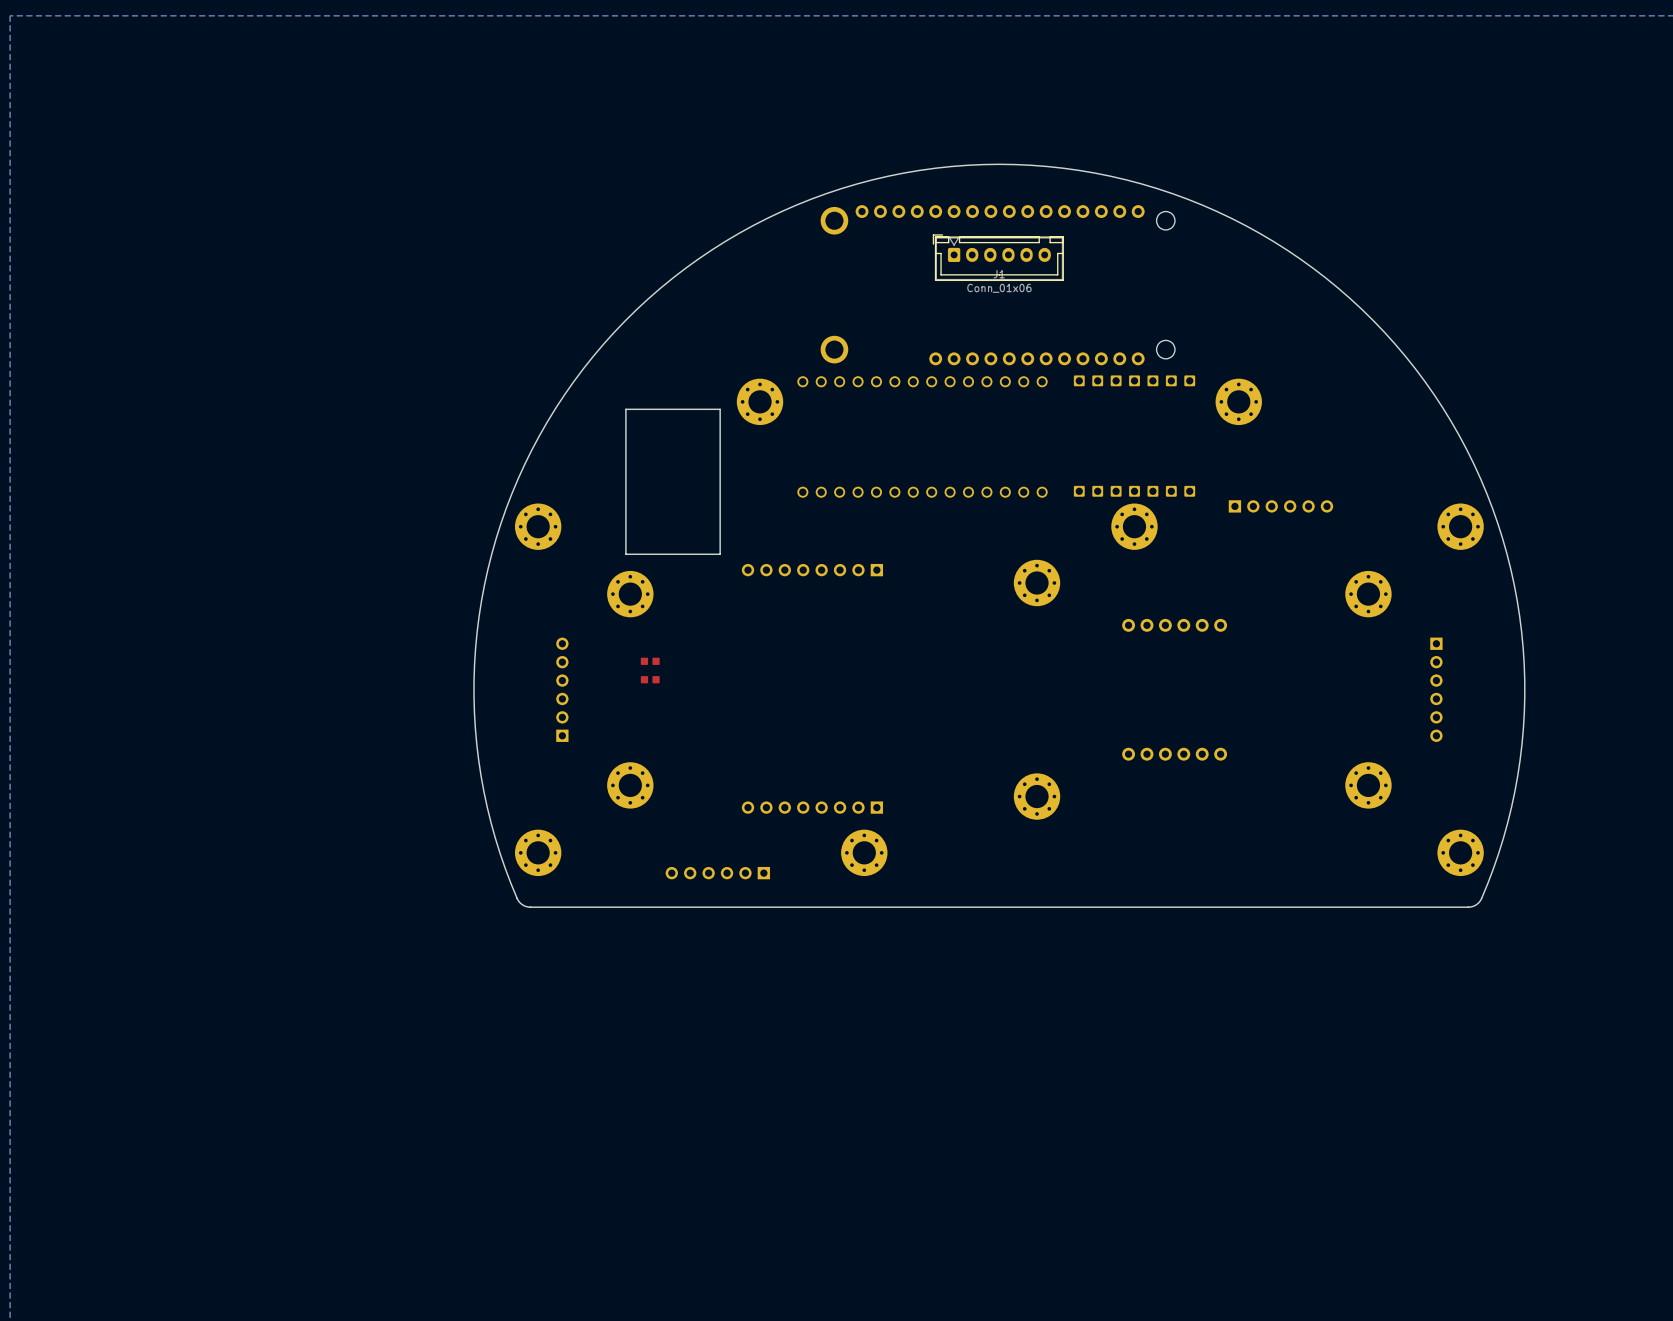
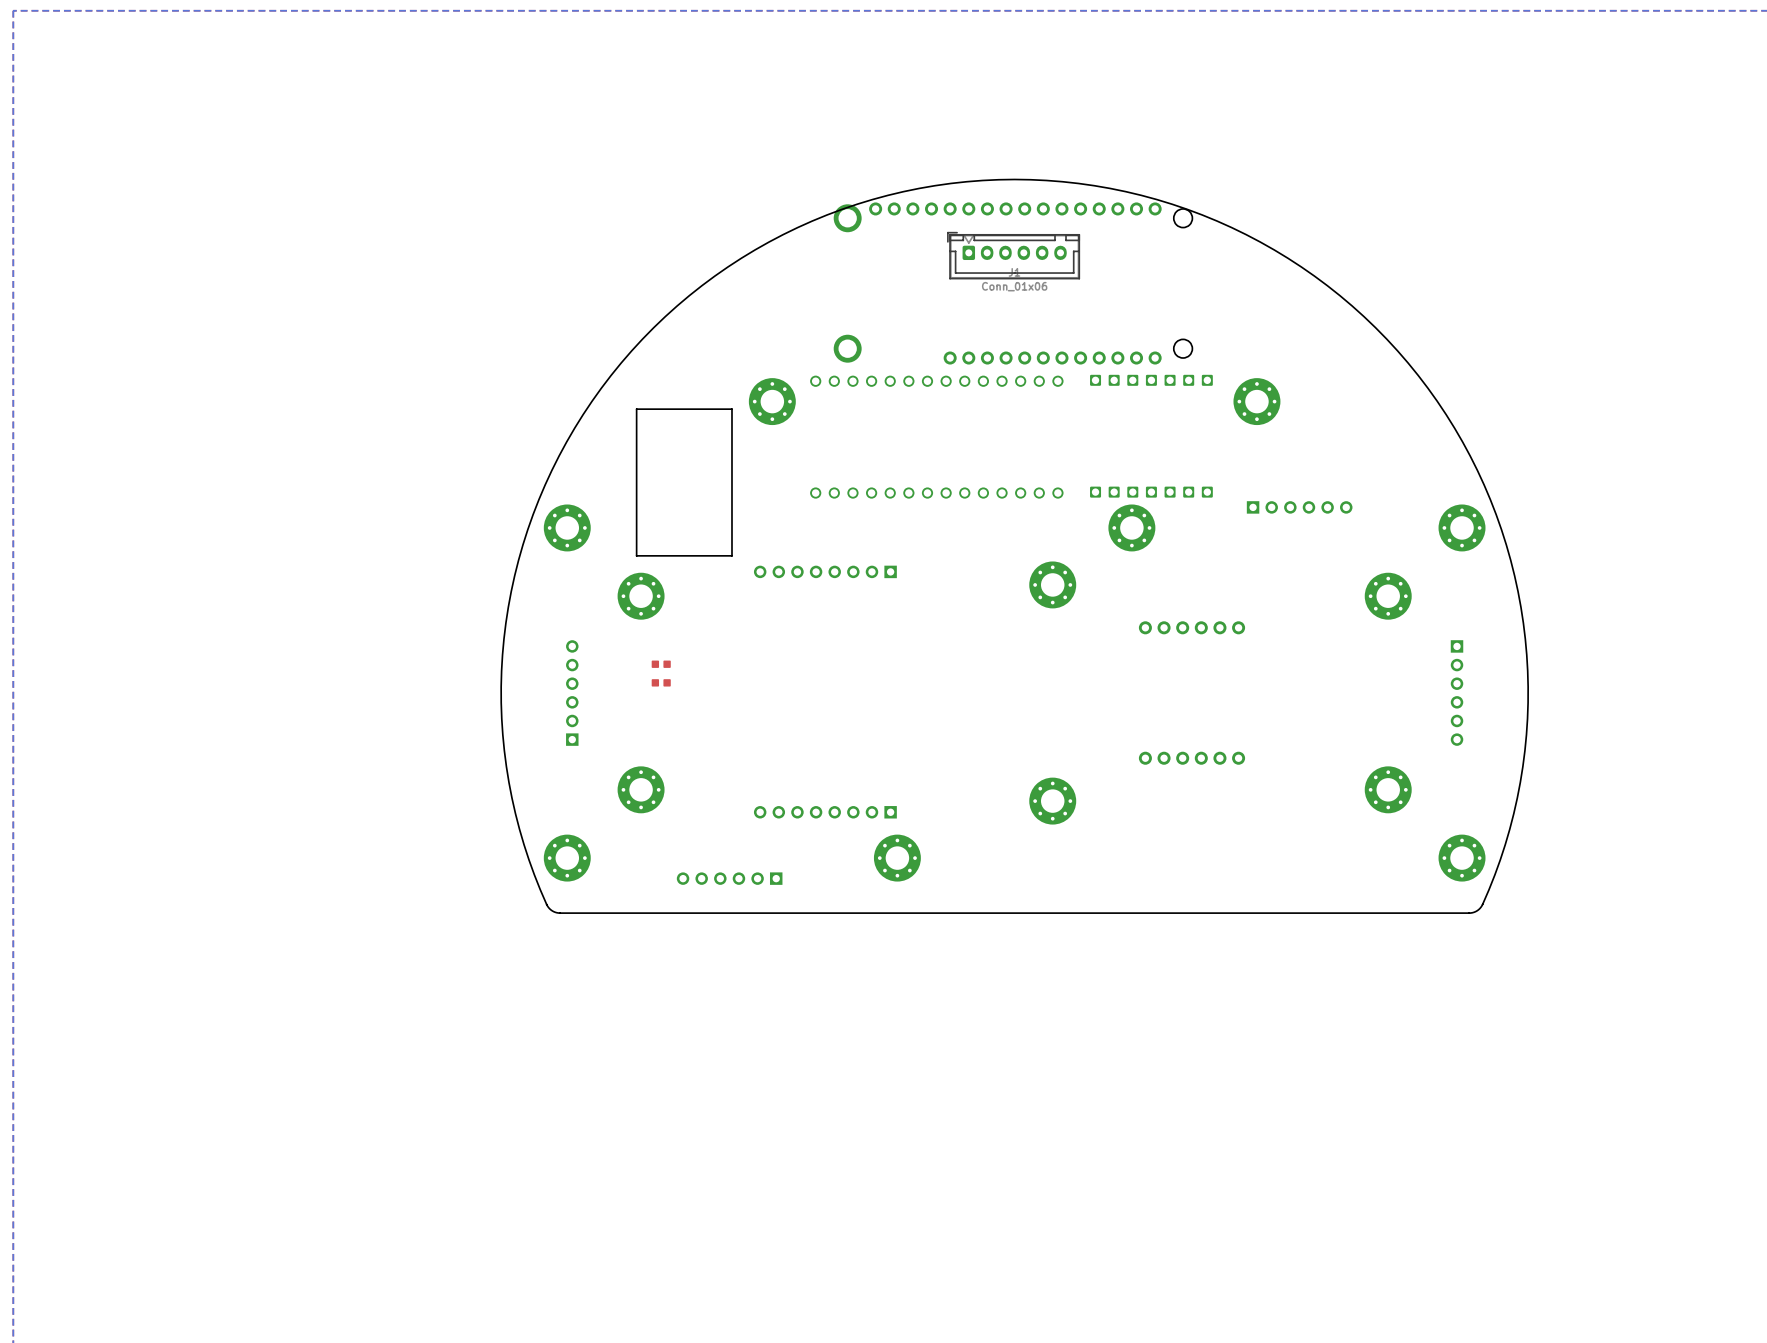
part position: (538, 526) -> (567, 527)
part position: (1134, 526) -> (1131, 527)
part position: (1460, 526) -> (1462, 527)
part position: (538, 852) -> (567, 858)
part position: (864, 852) -> (897, 858)
part position: (1460, 852) -> (1462, 858)
board edge: (1448, 907) (1469, 907) (1477, 903) (1493, 868) (1514, 791) (1522, 744) (1524, 696) (1521, 632) (1506, 553) (1480, 478) (1451, 421) (1415, 368) (1373, 320) (1325, 277) (1259, 233) (1201, 204) (1141, 183) (1063, 168) (999, 164) (935, 168) (872, 179) (811, 199) (739, 233) (673, 277) (625, 320) (583, 368) (547, 421) (518, 478) (491, 553) (477, 632) (473, 696) (481, 775) (491, 822) (505, 868) (521, 903) (528, 907) (550, 907) -> (1469, 913) (1477, 910) (1482, 904) (1500, 859) (1513, 813) (1526, 734) (1527, 670) (1520, 607) (1506, 544) (1484, 484) (1454, 428) (1418, 375) (1375, 327) (1327, 285) (1260, 242) (1202, 215) (1141, 195) (1078, 183) (1014, 179) (950, 183) (872, 199) (812, 221) (755, 249) (701, 285) (653, 327) (611, 375) (574, 428) (545, 484) (522, 544) (508, 607) (501, 670) (504, 750) (515, 813) (528, 859) (546, 904) (552, 910) (560, 913)

